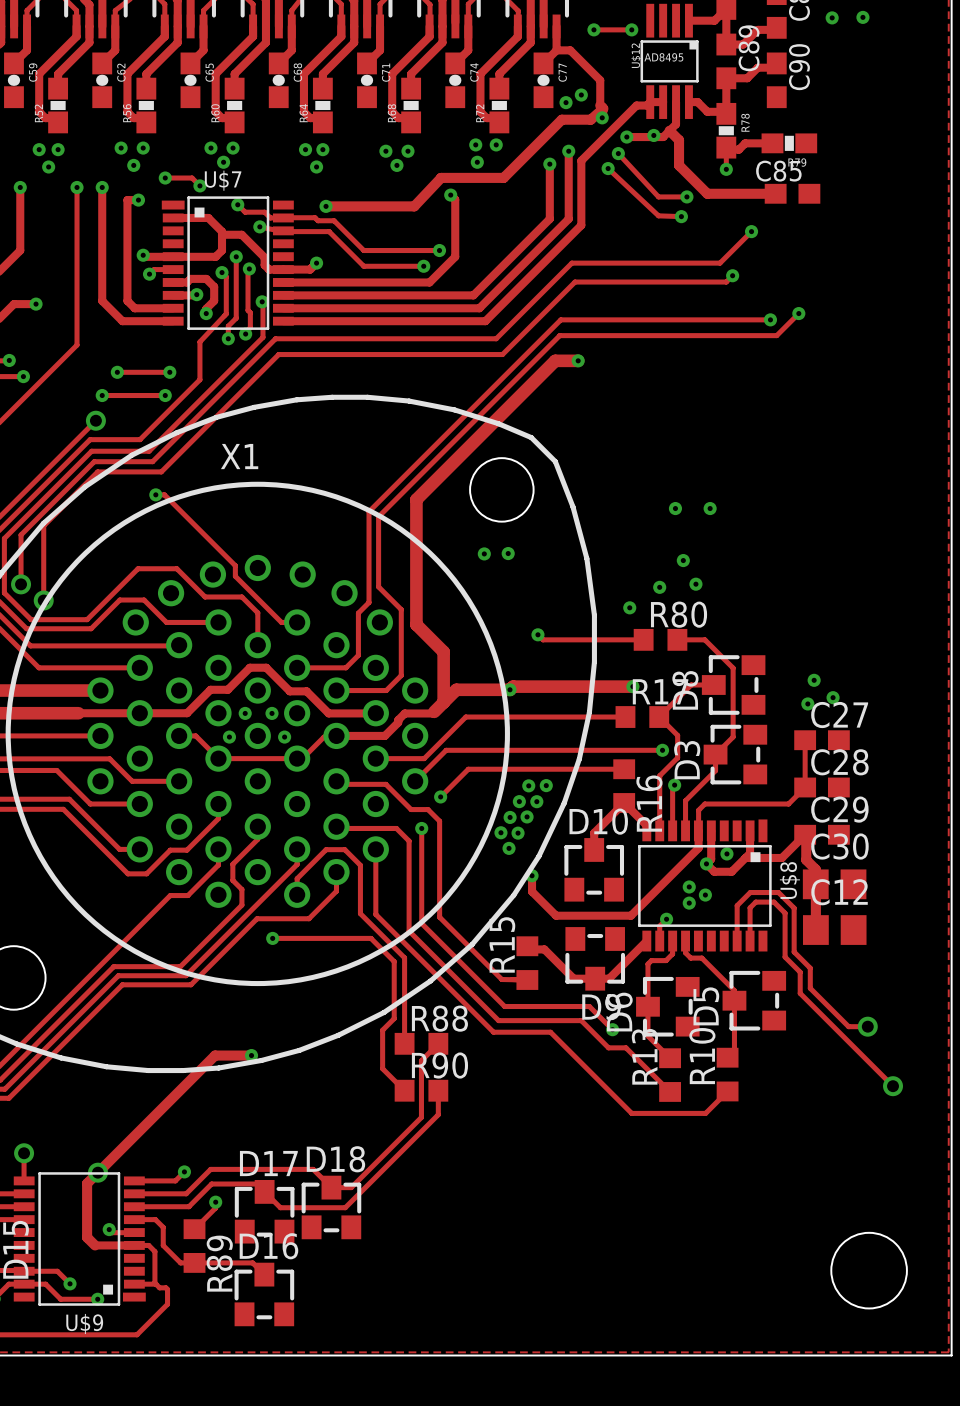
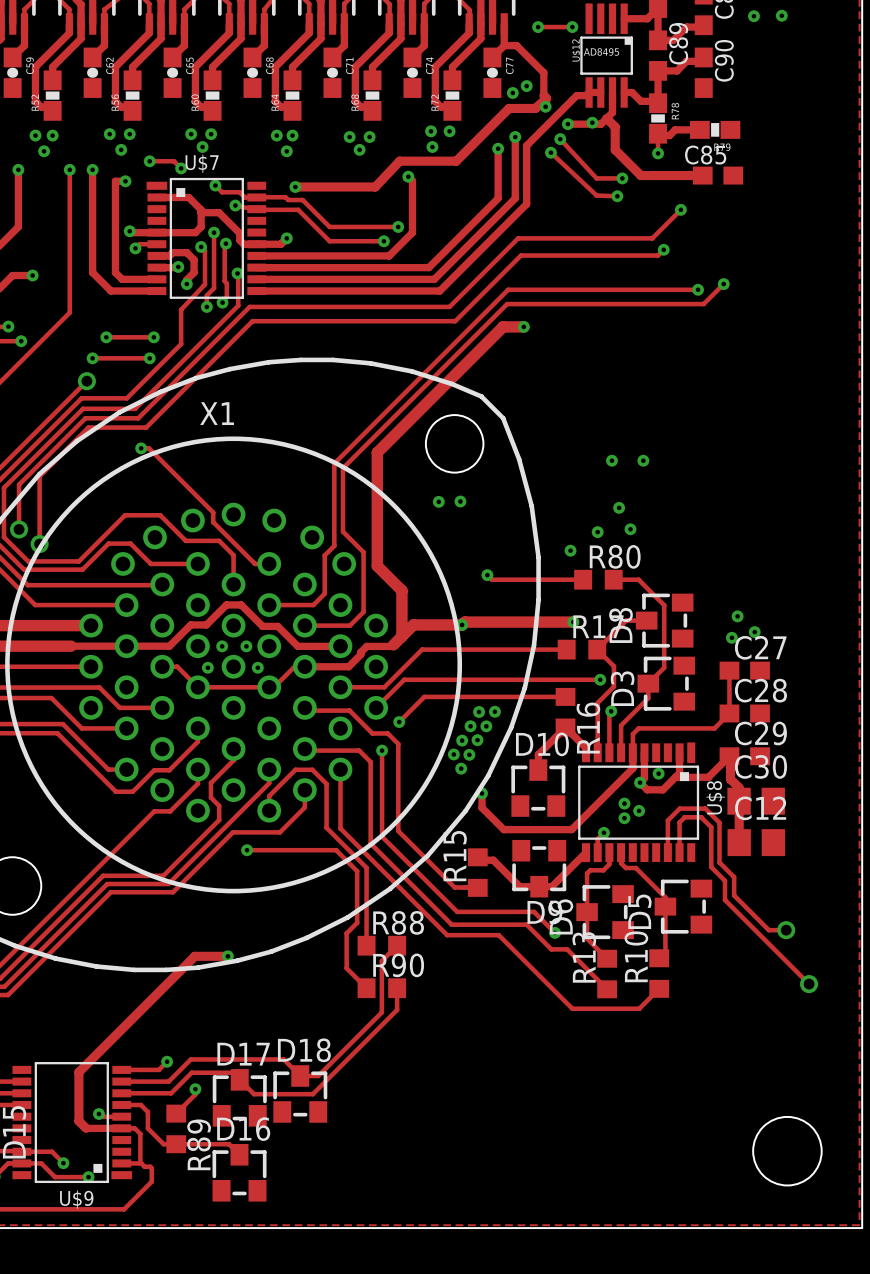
track: (24, 1153) (24, 1180) -> none
via: (24, 1153) -> none
via: (97, 1172) -> none

